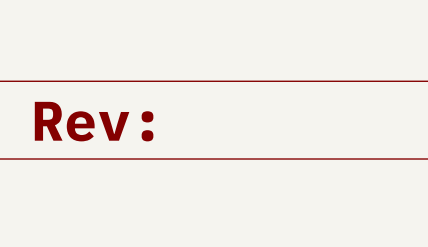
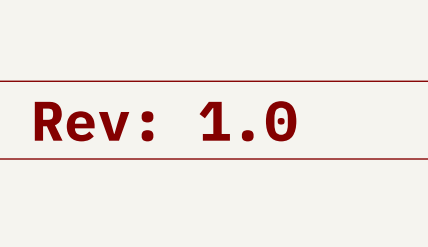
title block: Rev: (94, 121) -> Rev: 1.0 (165, 121)

